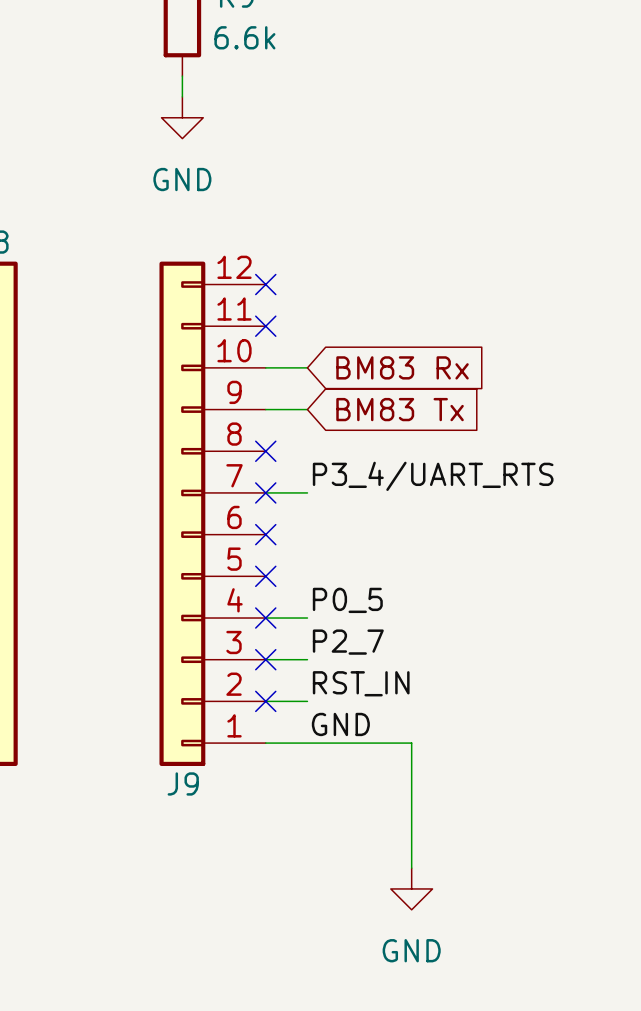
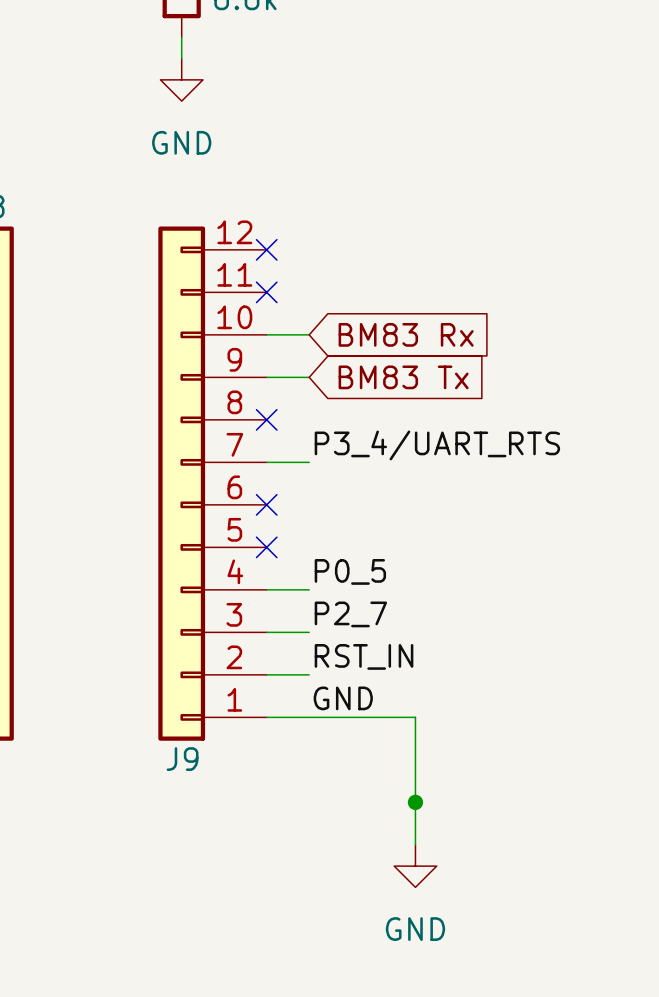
no-connect mark: (265, 492) -> none
no-connect mark: (265, 618) -> none
no-connect mark: (265, 659) -> none
no-connect mark: (265, 701) -> none
junction: none -> (415, 802)

